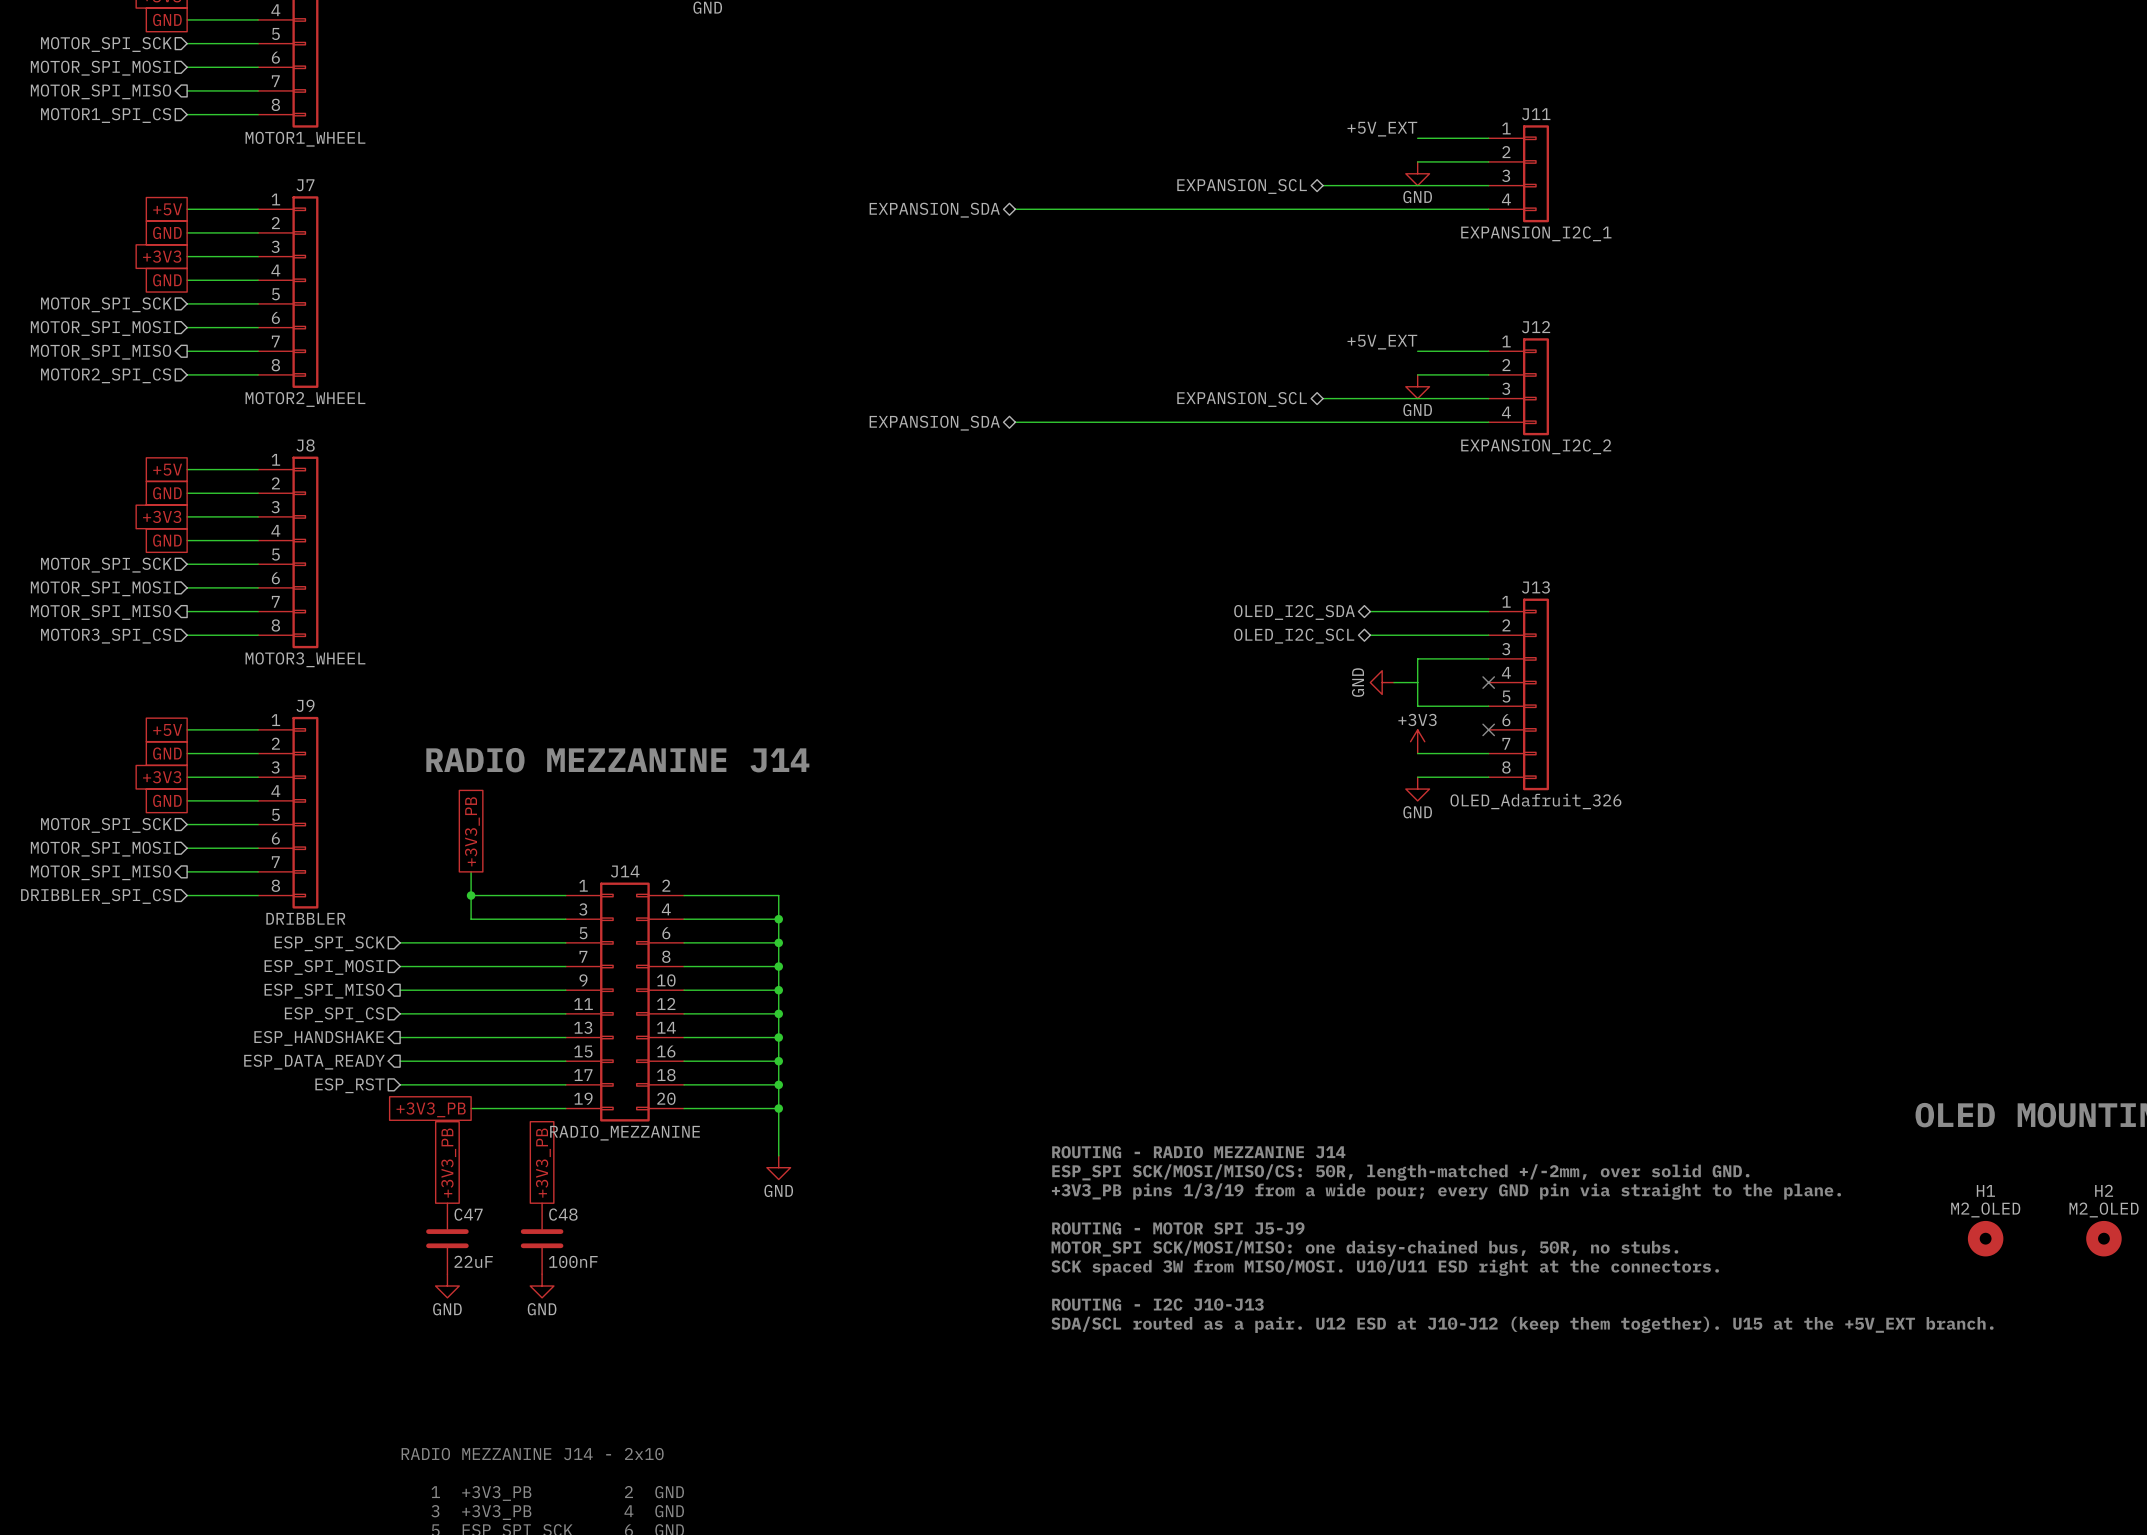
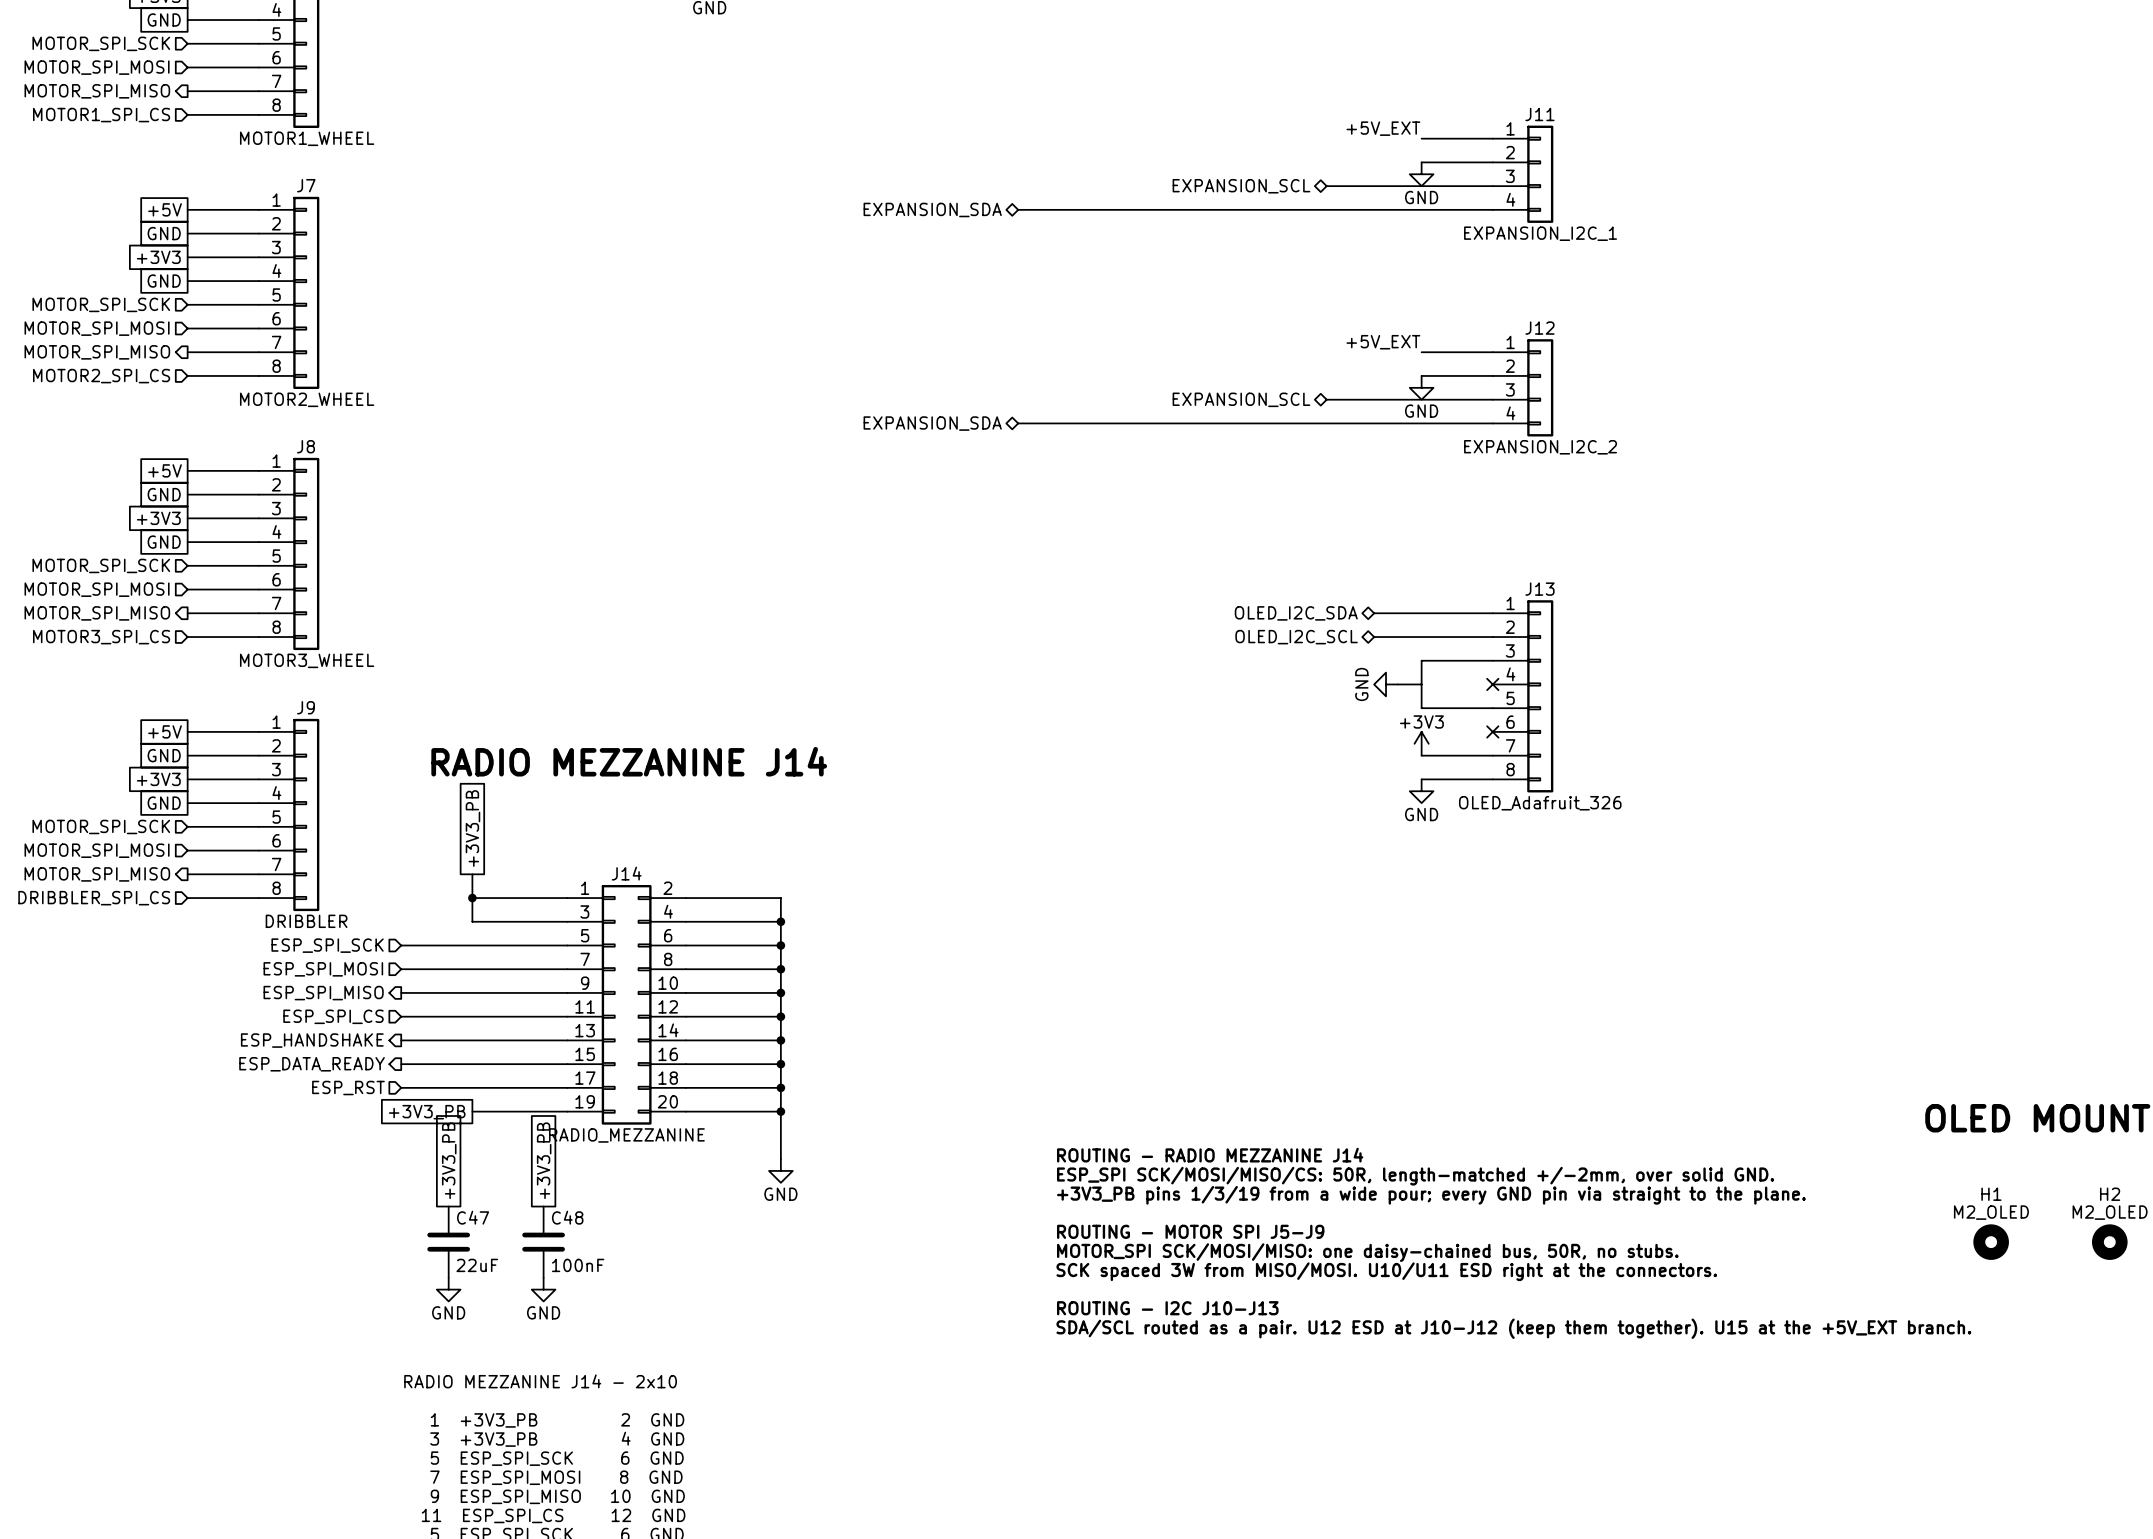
text: none -> RADIO MEZZANINE J14 - 2x10 (540, 1381)
text: none -> 1 +3V3_PB 2 GND (557, 1420)
text: none -> 3 +3V3_PB 4 GND (557, 1439)
text: RADIO MEZZANINE J14 - 2x10 (532, 1454) -> 5 ESP_SPI_SCK 6 GND (557, 1458)
text: none -> 7 ESP_SPI_MOSI 8 GND (556, 1477)
text: 1 +3V3_PB 2 GND (557, 1493) -> 9 ESP_SPI_MISO 10 GND (557, 1496)
text: 3 +3V3_PB 4 GND (557, 1512) -> 11 ESP_SPI_CS 12 GND (553, 1515)

